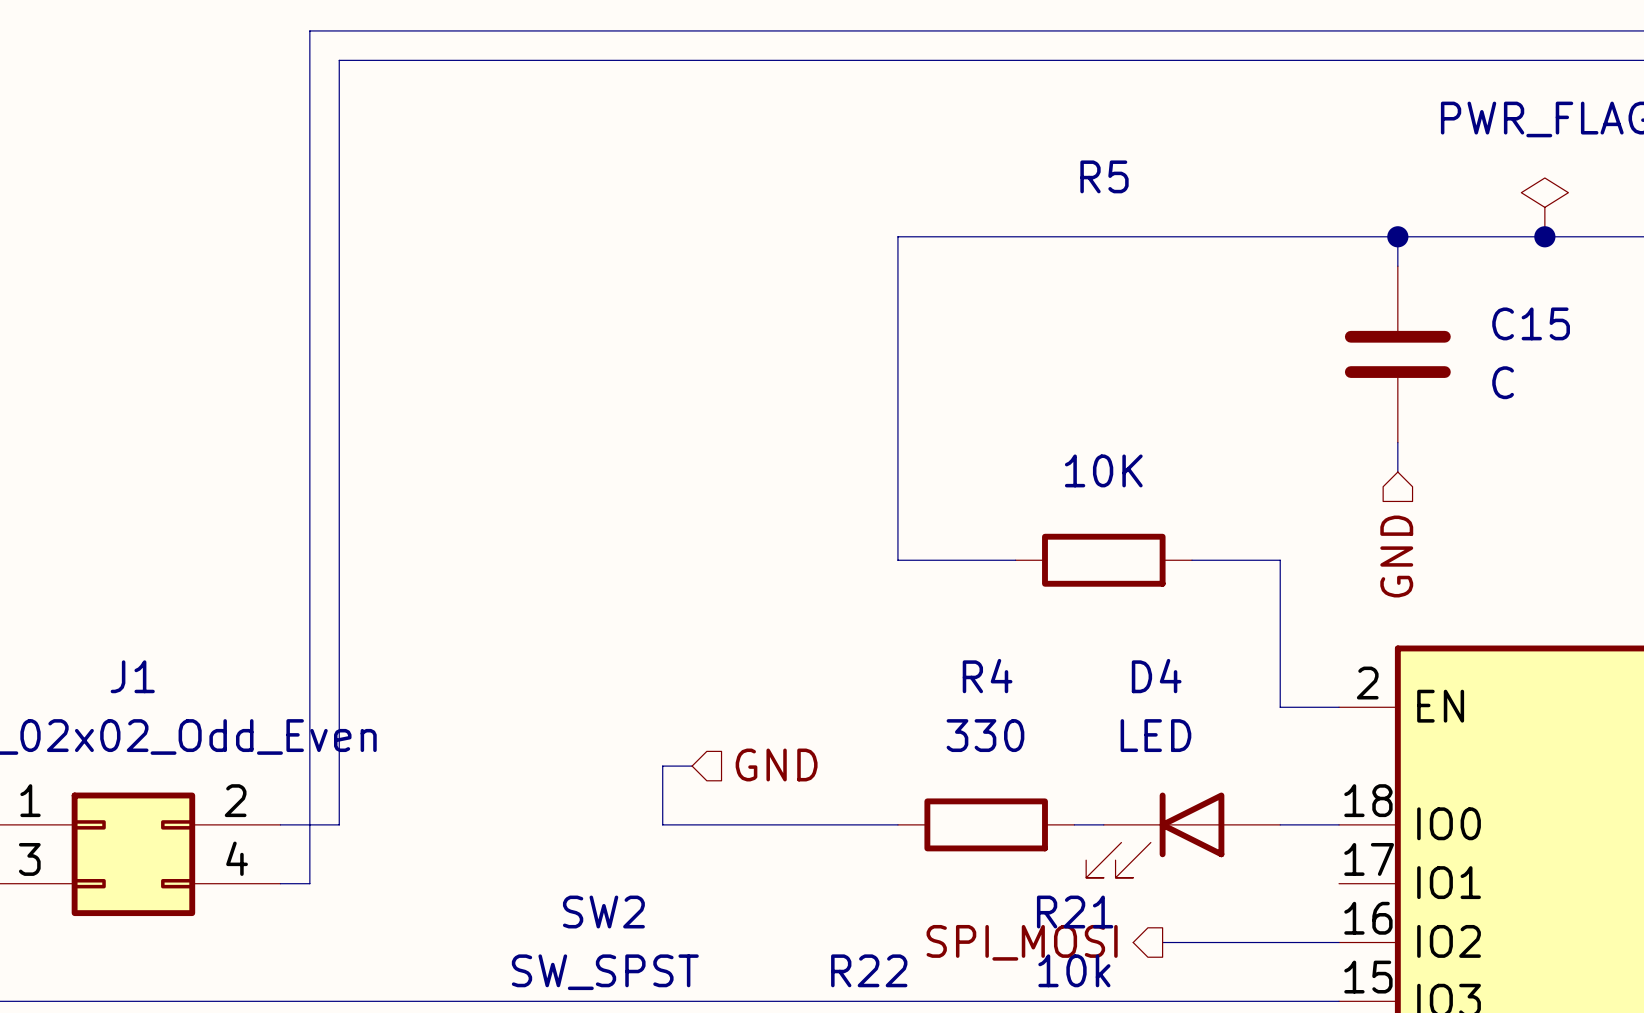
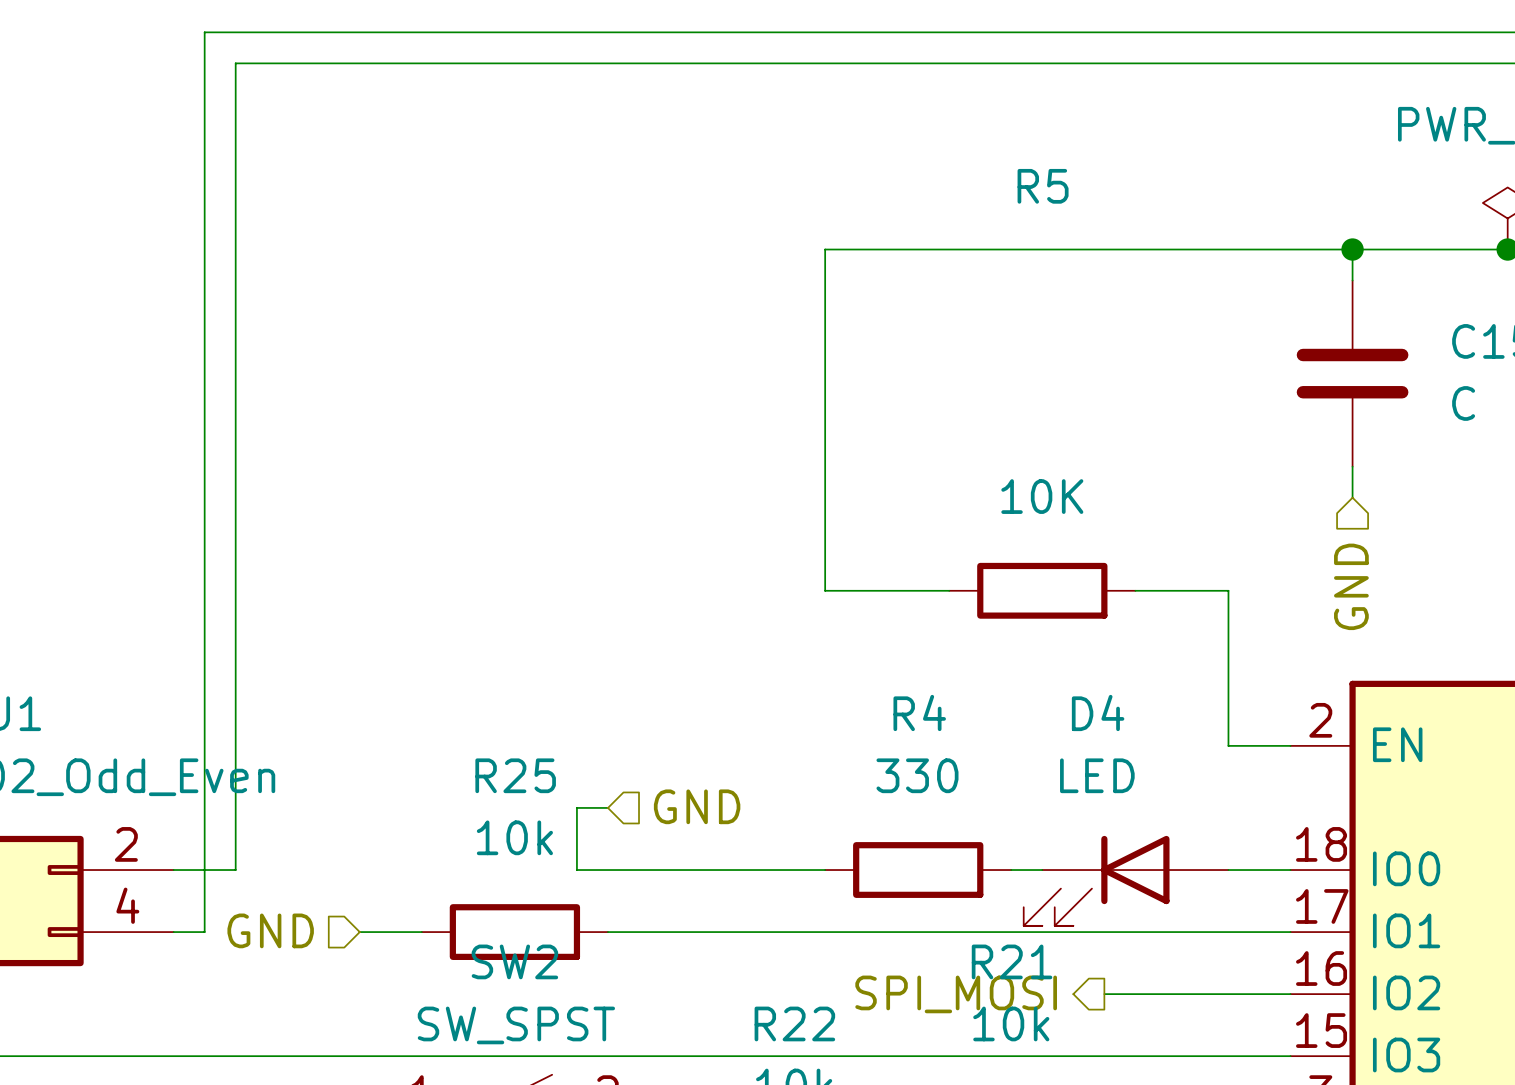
hierarchical label: none -> GND (270, 930)
wire: none -> (359, 932) (421, 932)
R25: none -> 10k (514, 932)
wire: none -> (607, 932) (1290, 932)

